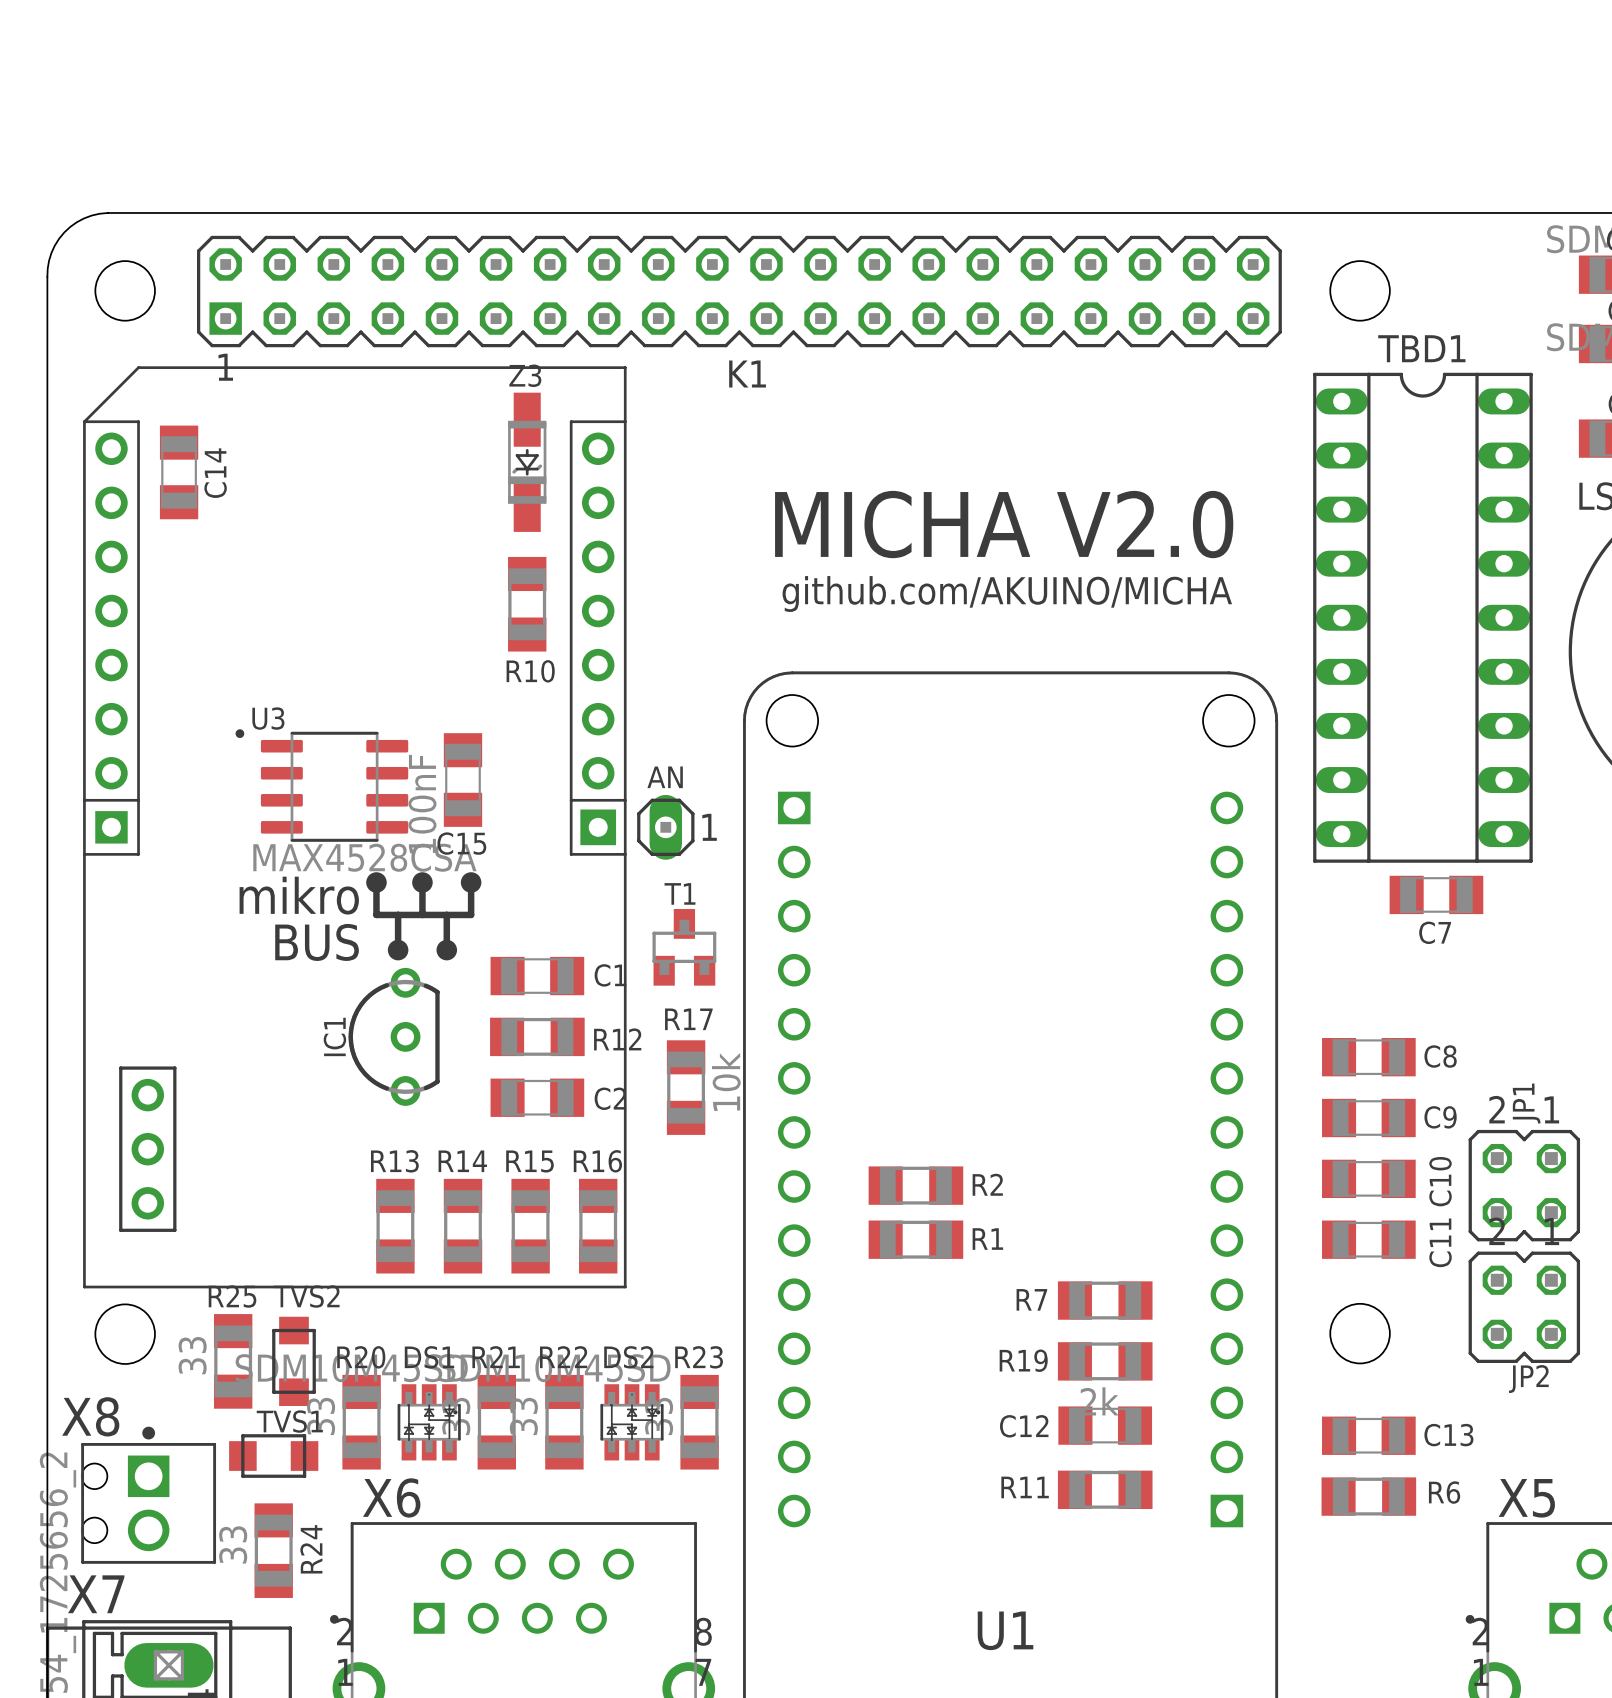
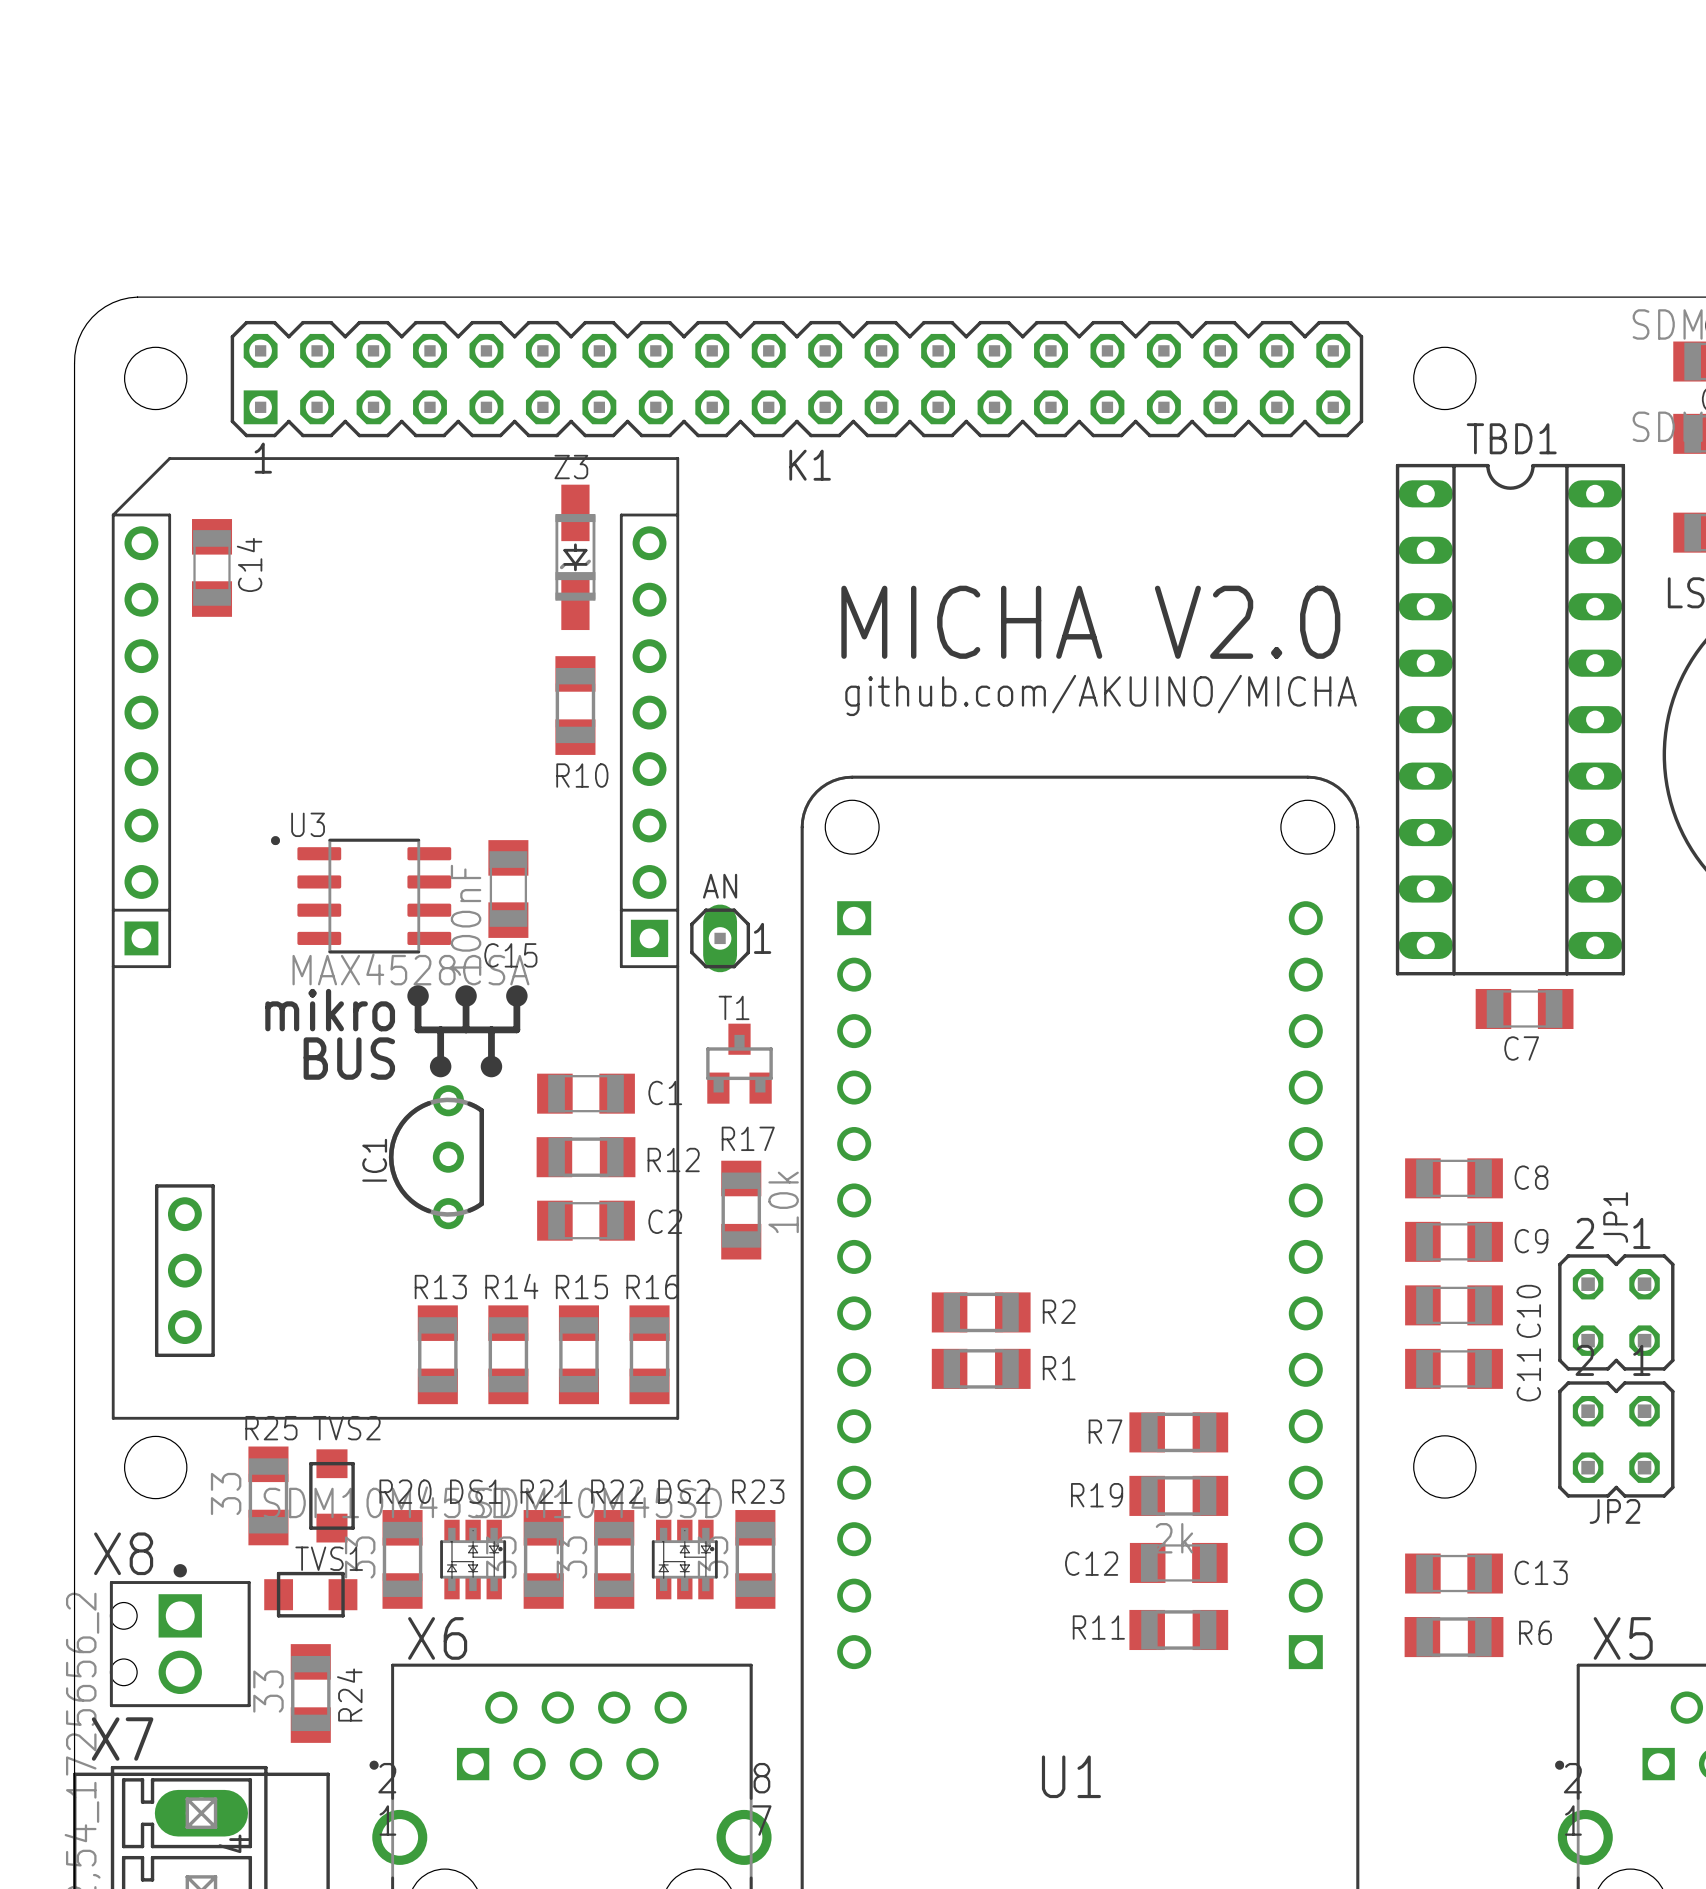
part footprint: [83, 366, 627, 1289] -> [111, 457, 680, 1420]

